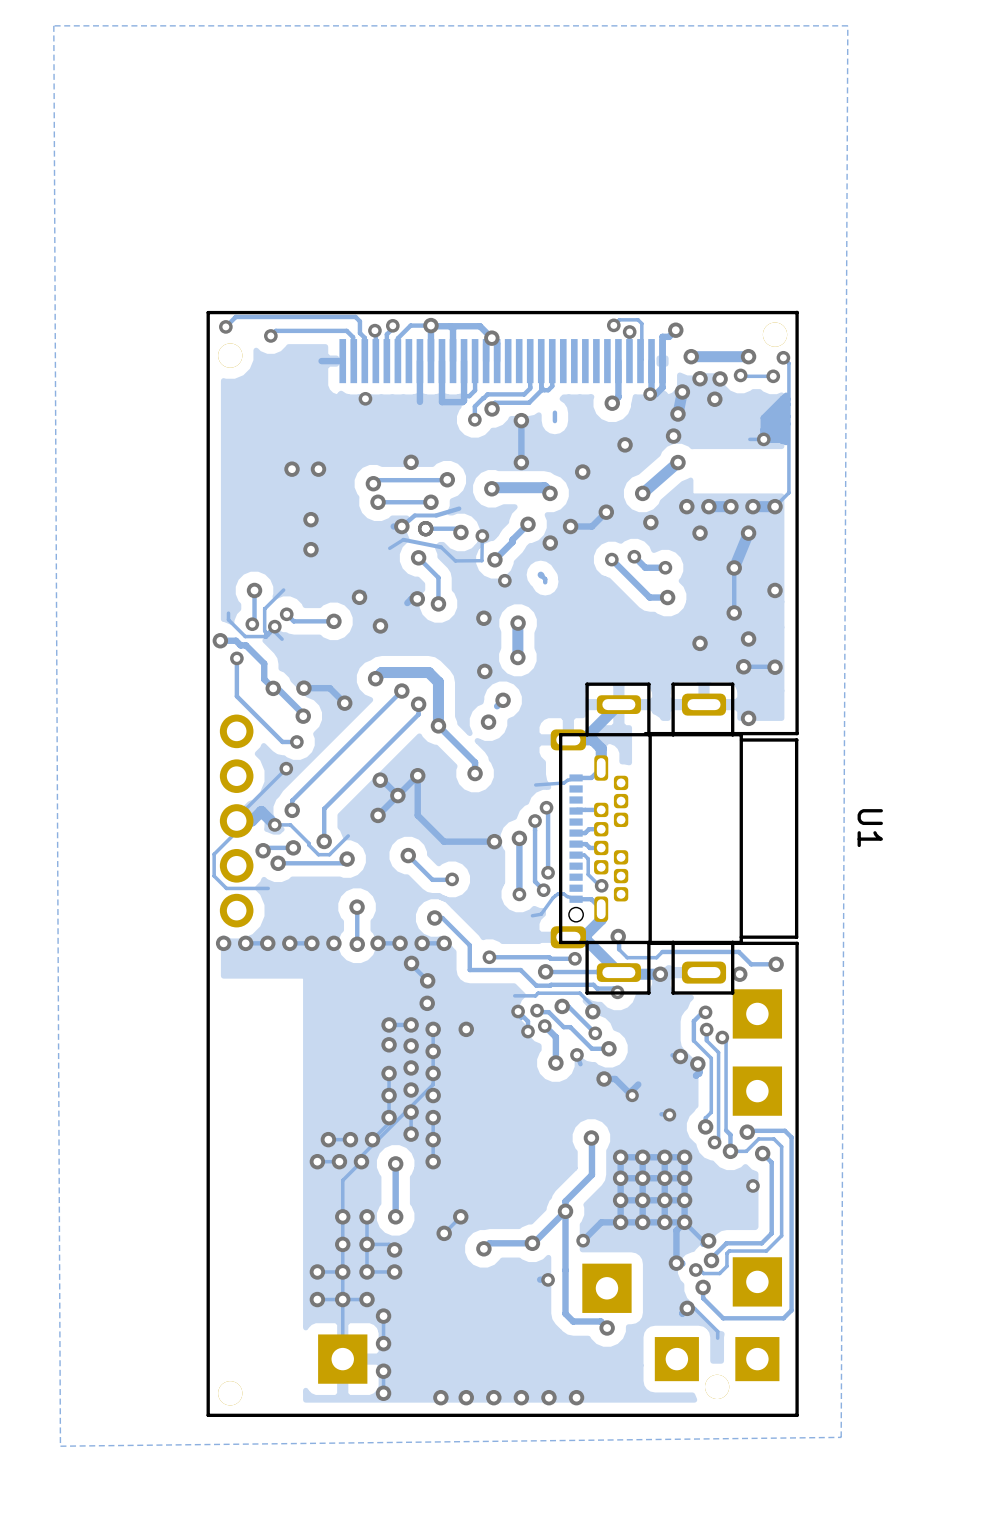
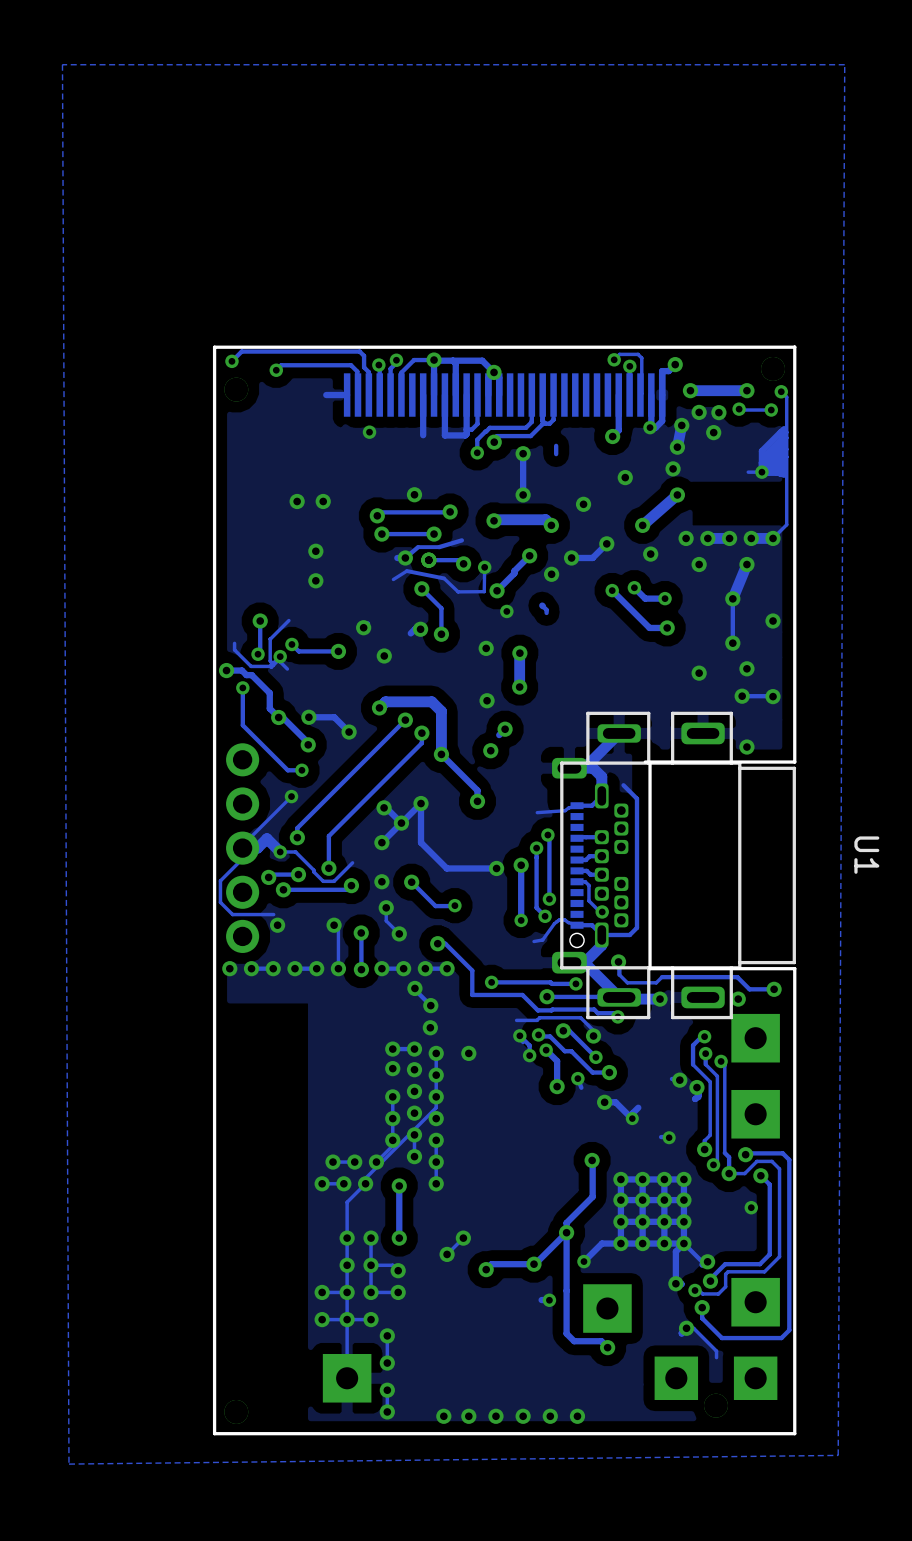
track: none -> (623, 785) (637, 798) (637, 927) (629, 934) (601, 934)
via: none -> (381, 881)
track: none -> (386, 907) (386, 920) (399, 933)
via: none -> (386, 907)
via: none -> (277, 925)
track: none -> (334, 925) (338, 929) (338, 968)
via: none -> (334, 925)
via: none -> (399, 933)

